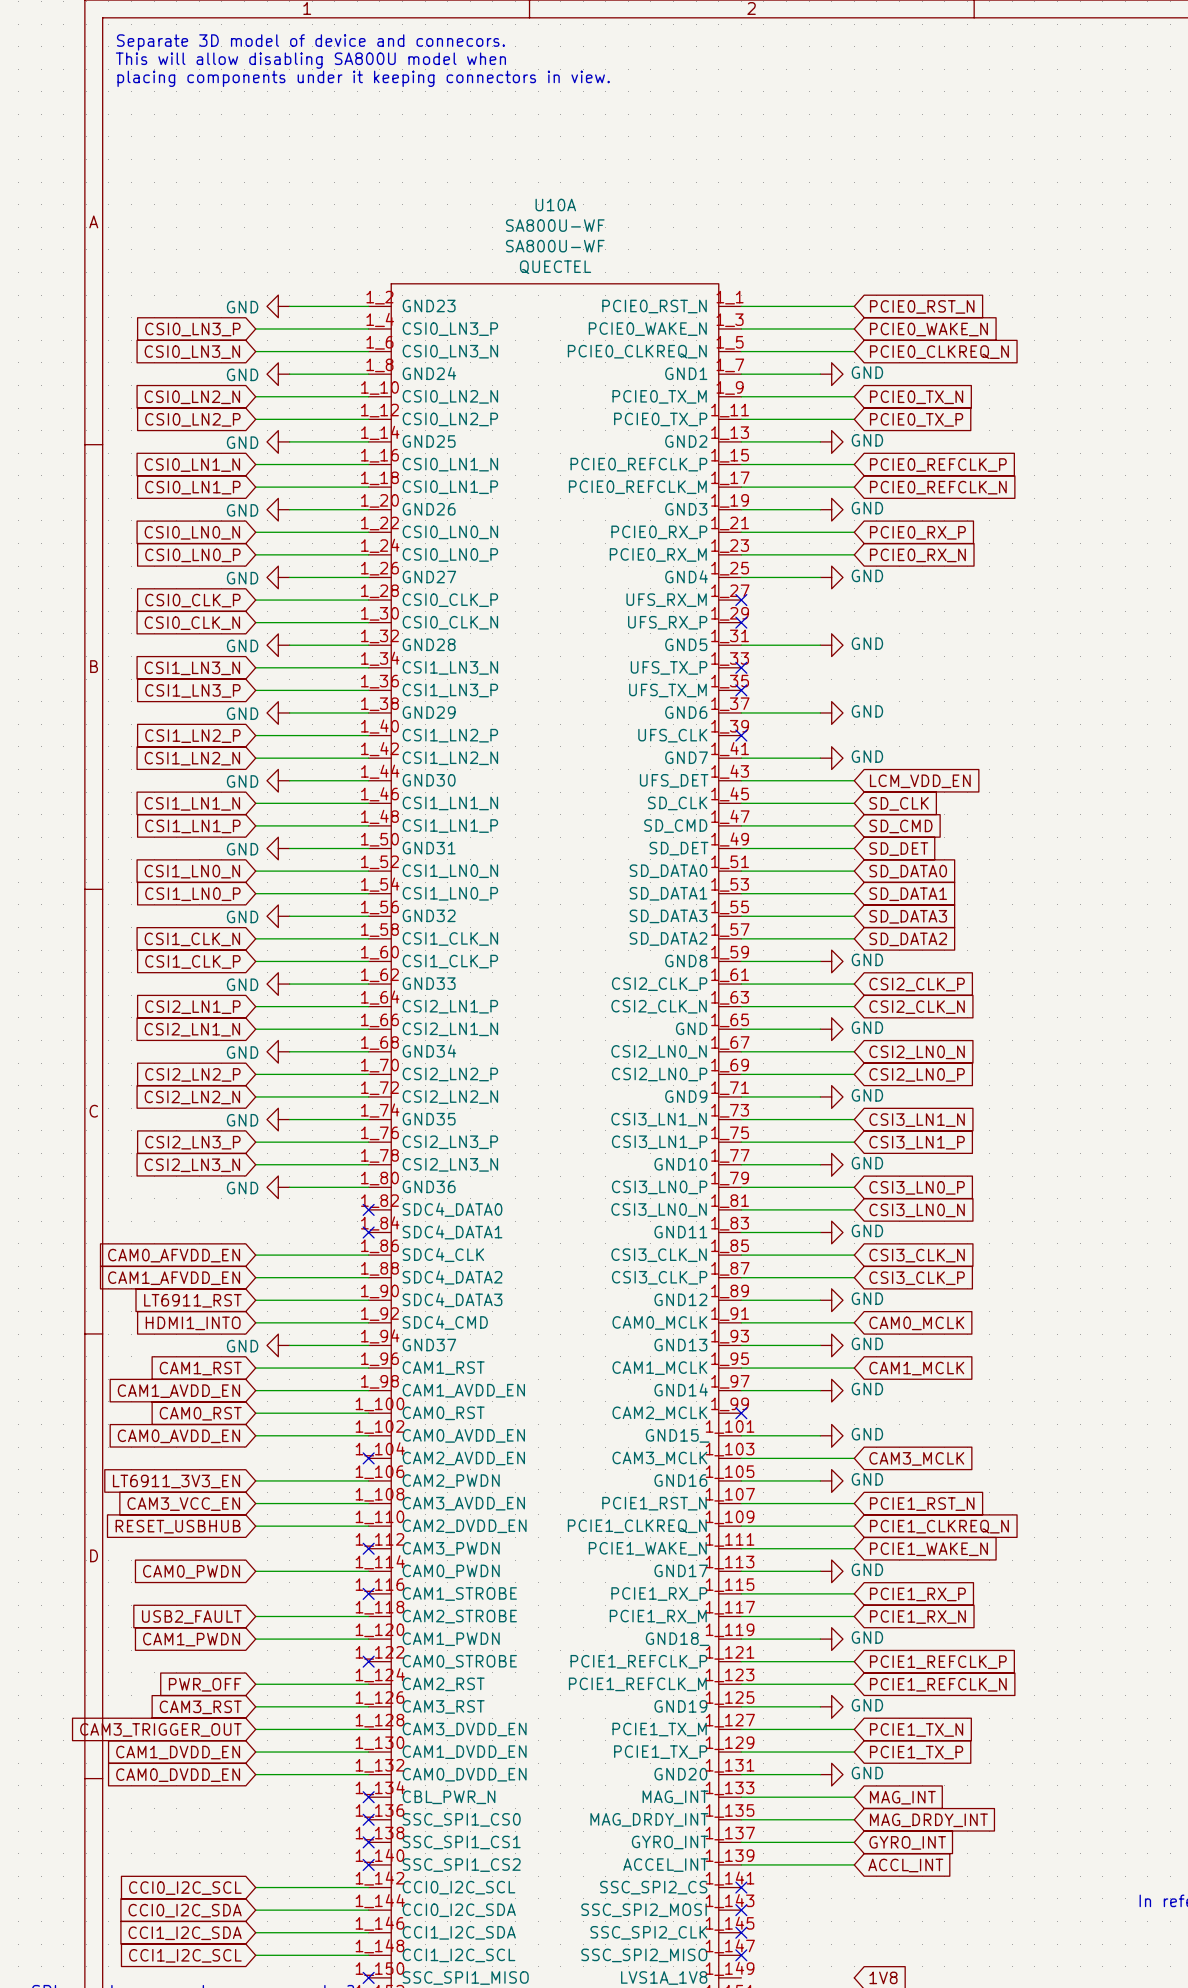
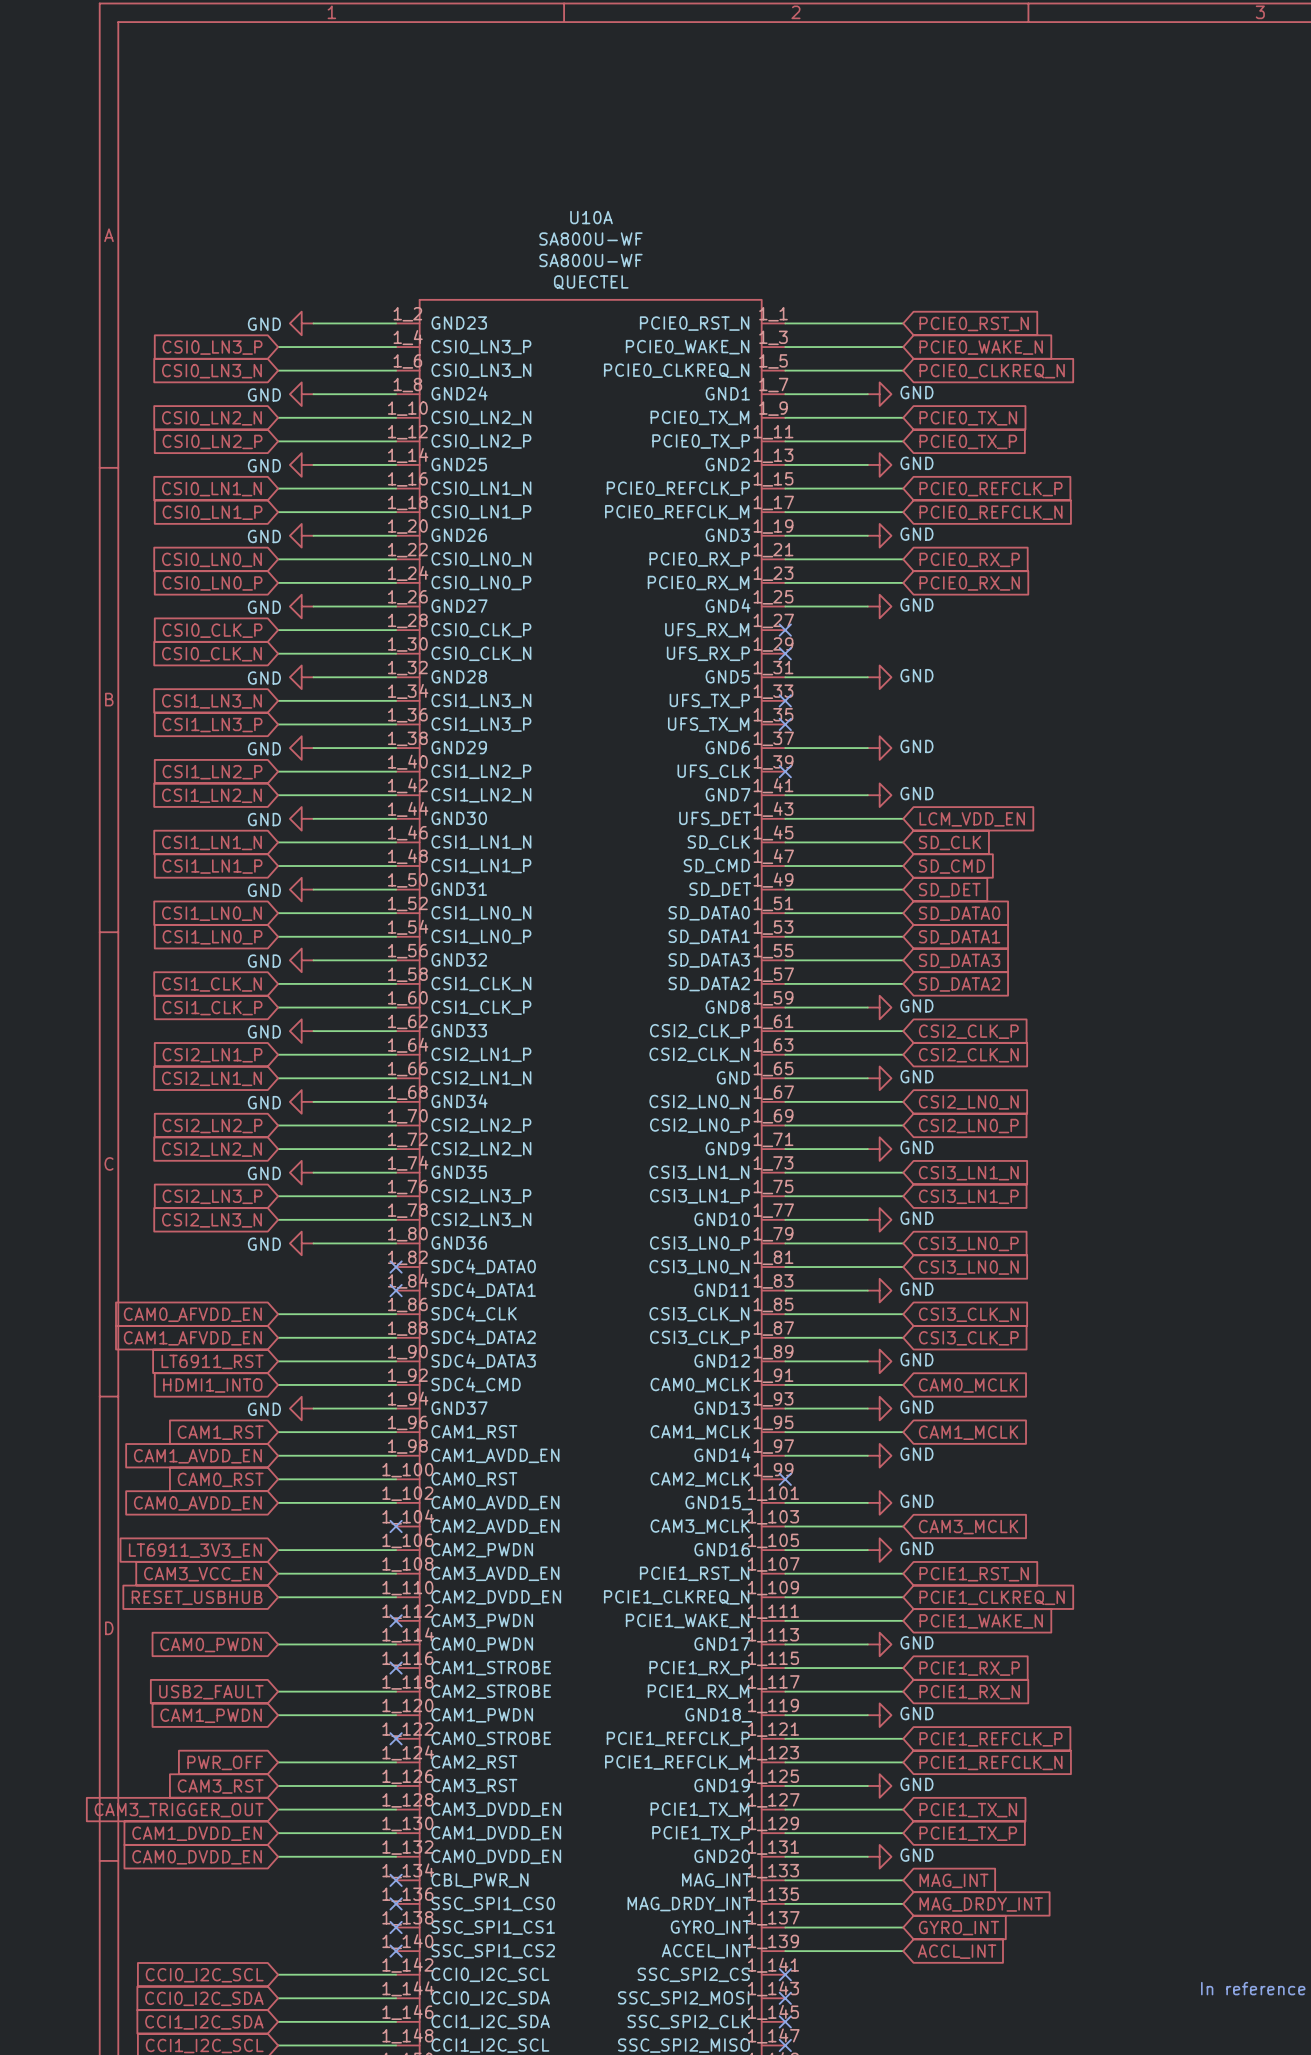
text: Separate 3D model of device and connecors. (310, 42) -> none
text: This will allow disabling SA800U model when (310, 60) -> none
text: placing components under it keeping connectors in view. (363, 78) -> none

